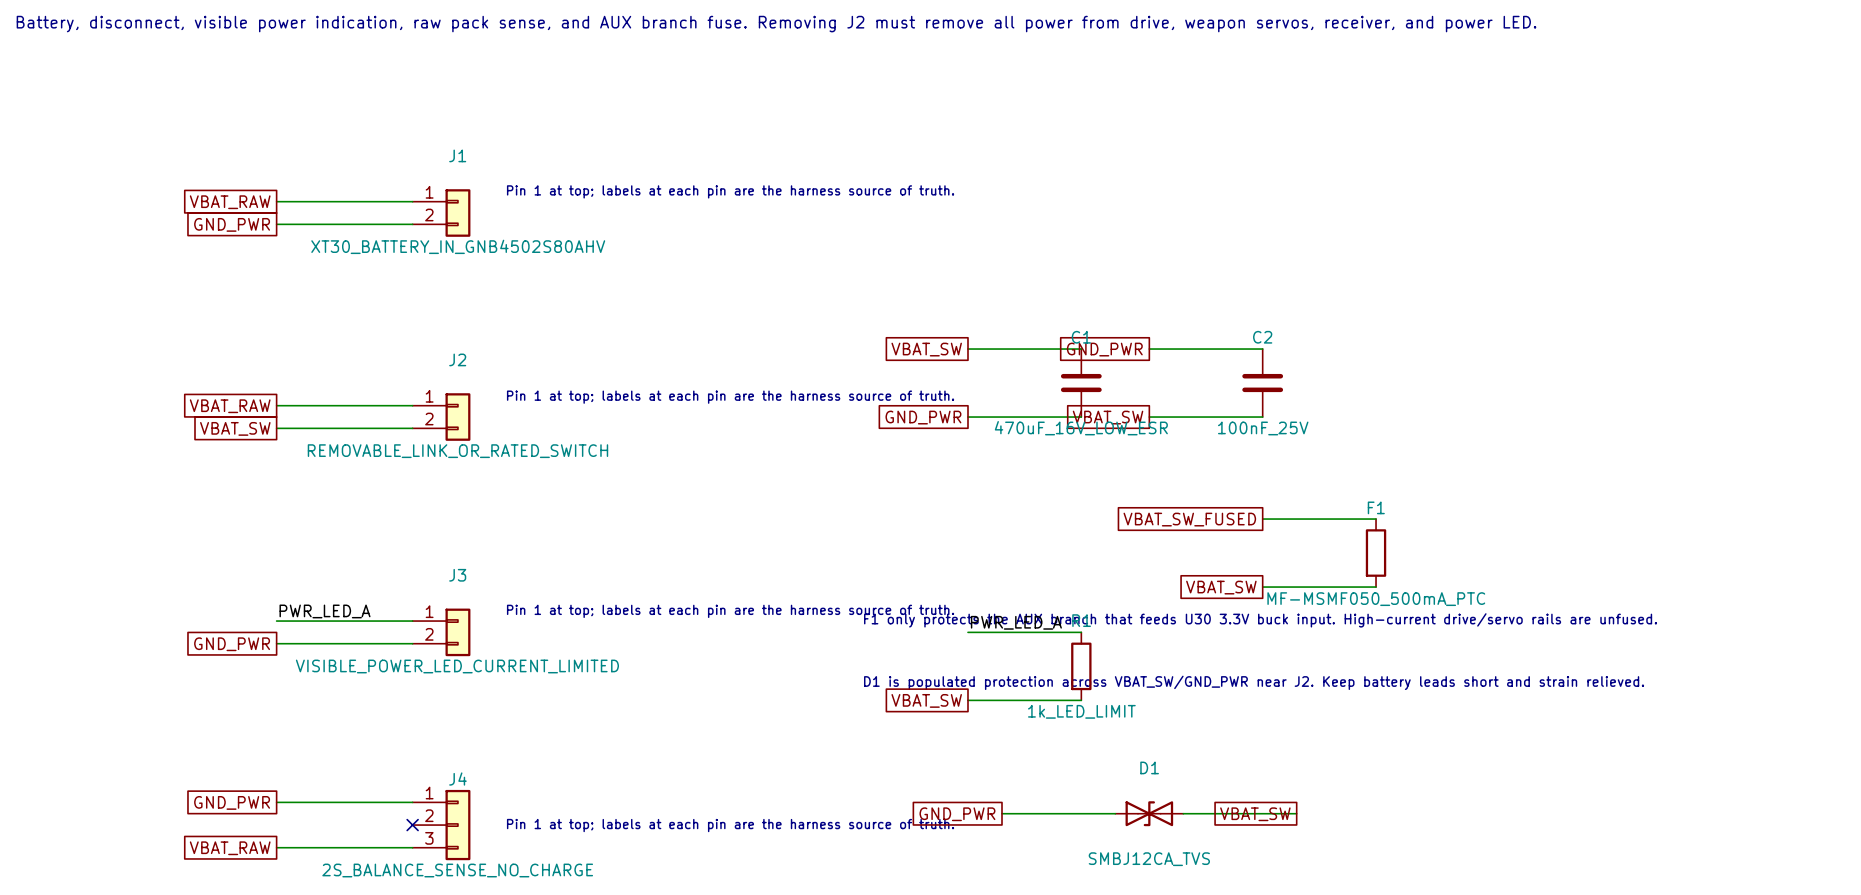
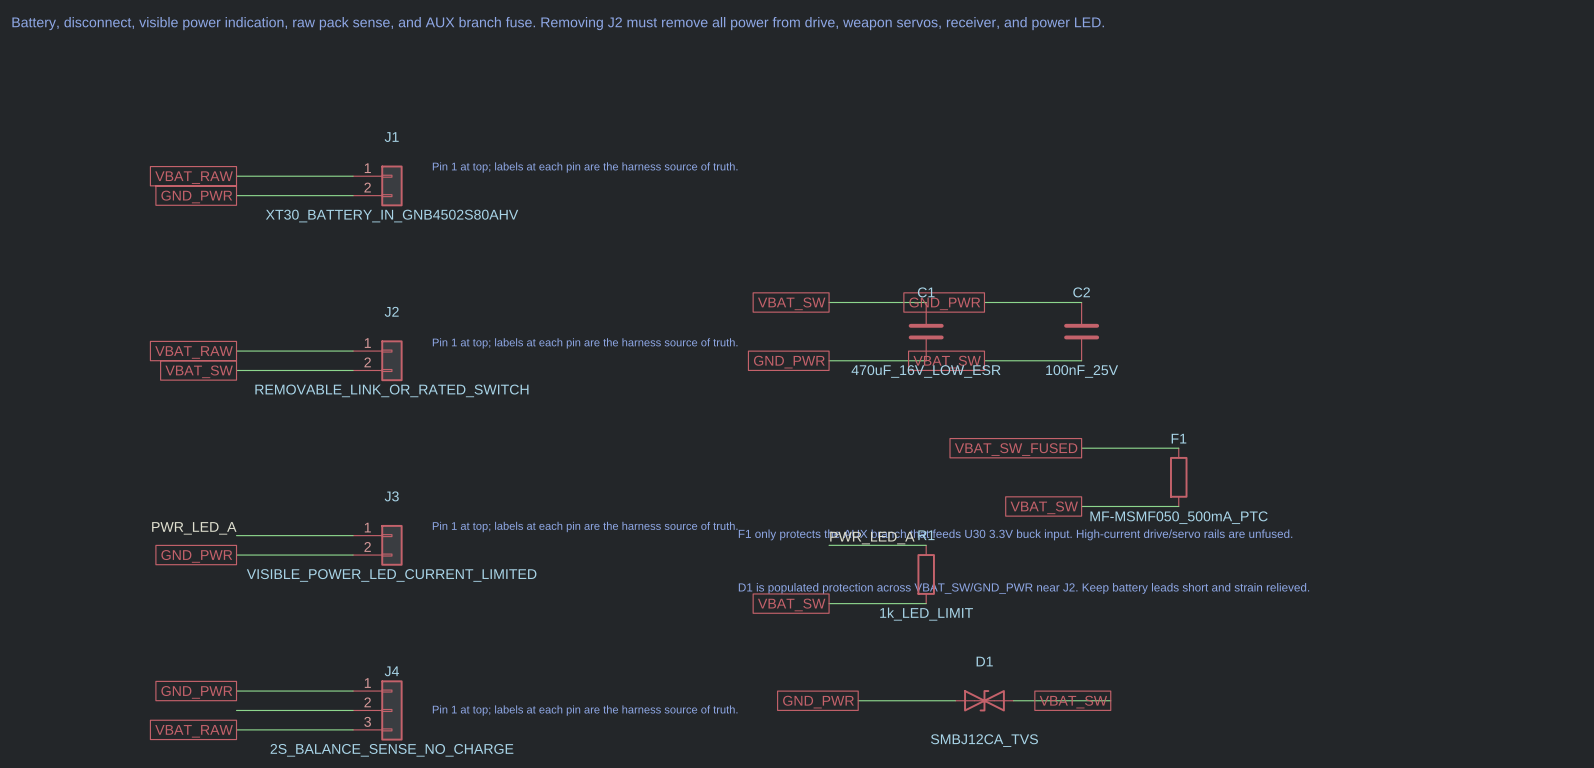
label position: PWR_LED_A (325, 611) -> PWR_LED_A (194, 528)
wire: none -> (236, 710) (353, 710)
no-connect mark: (412, 825) -> none

